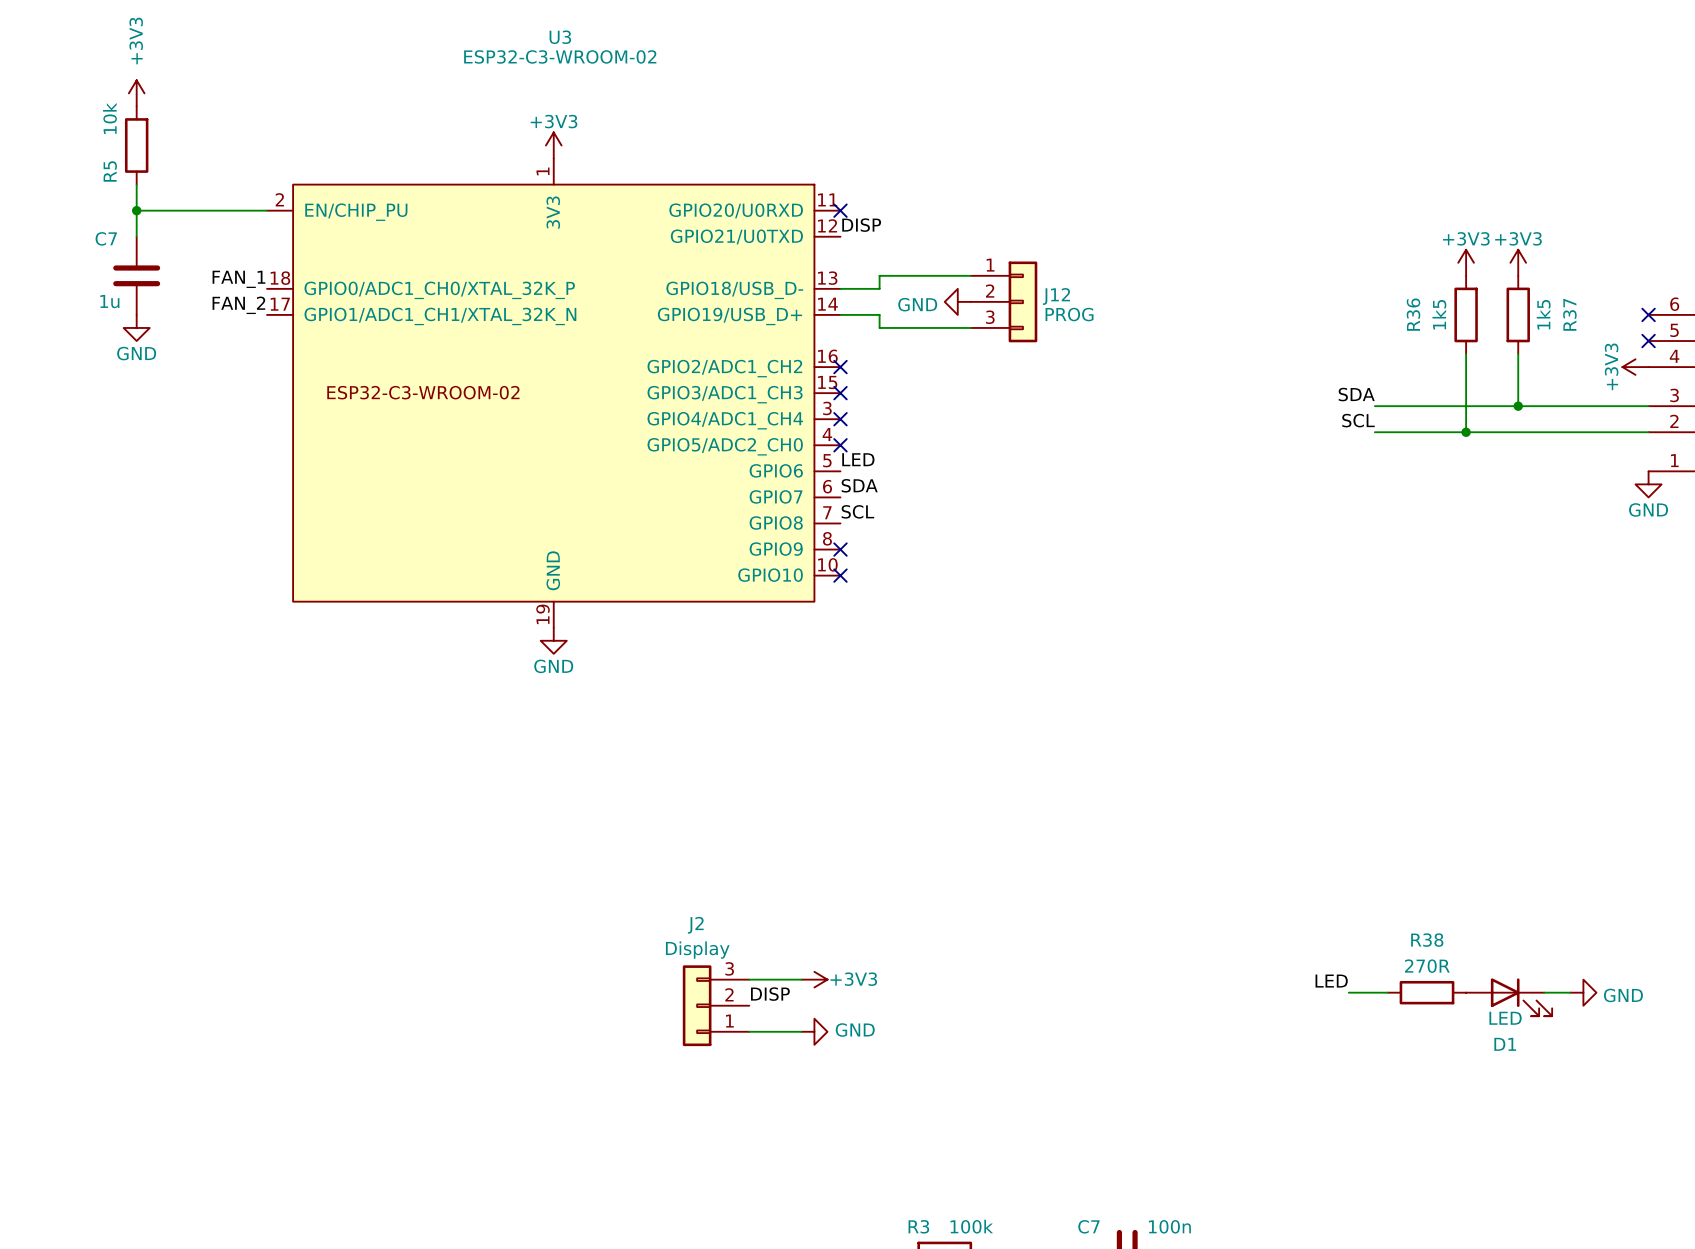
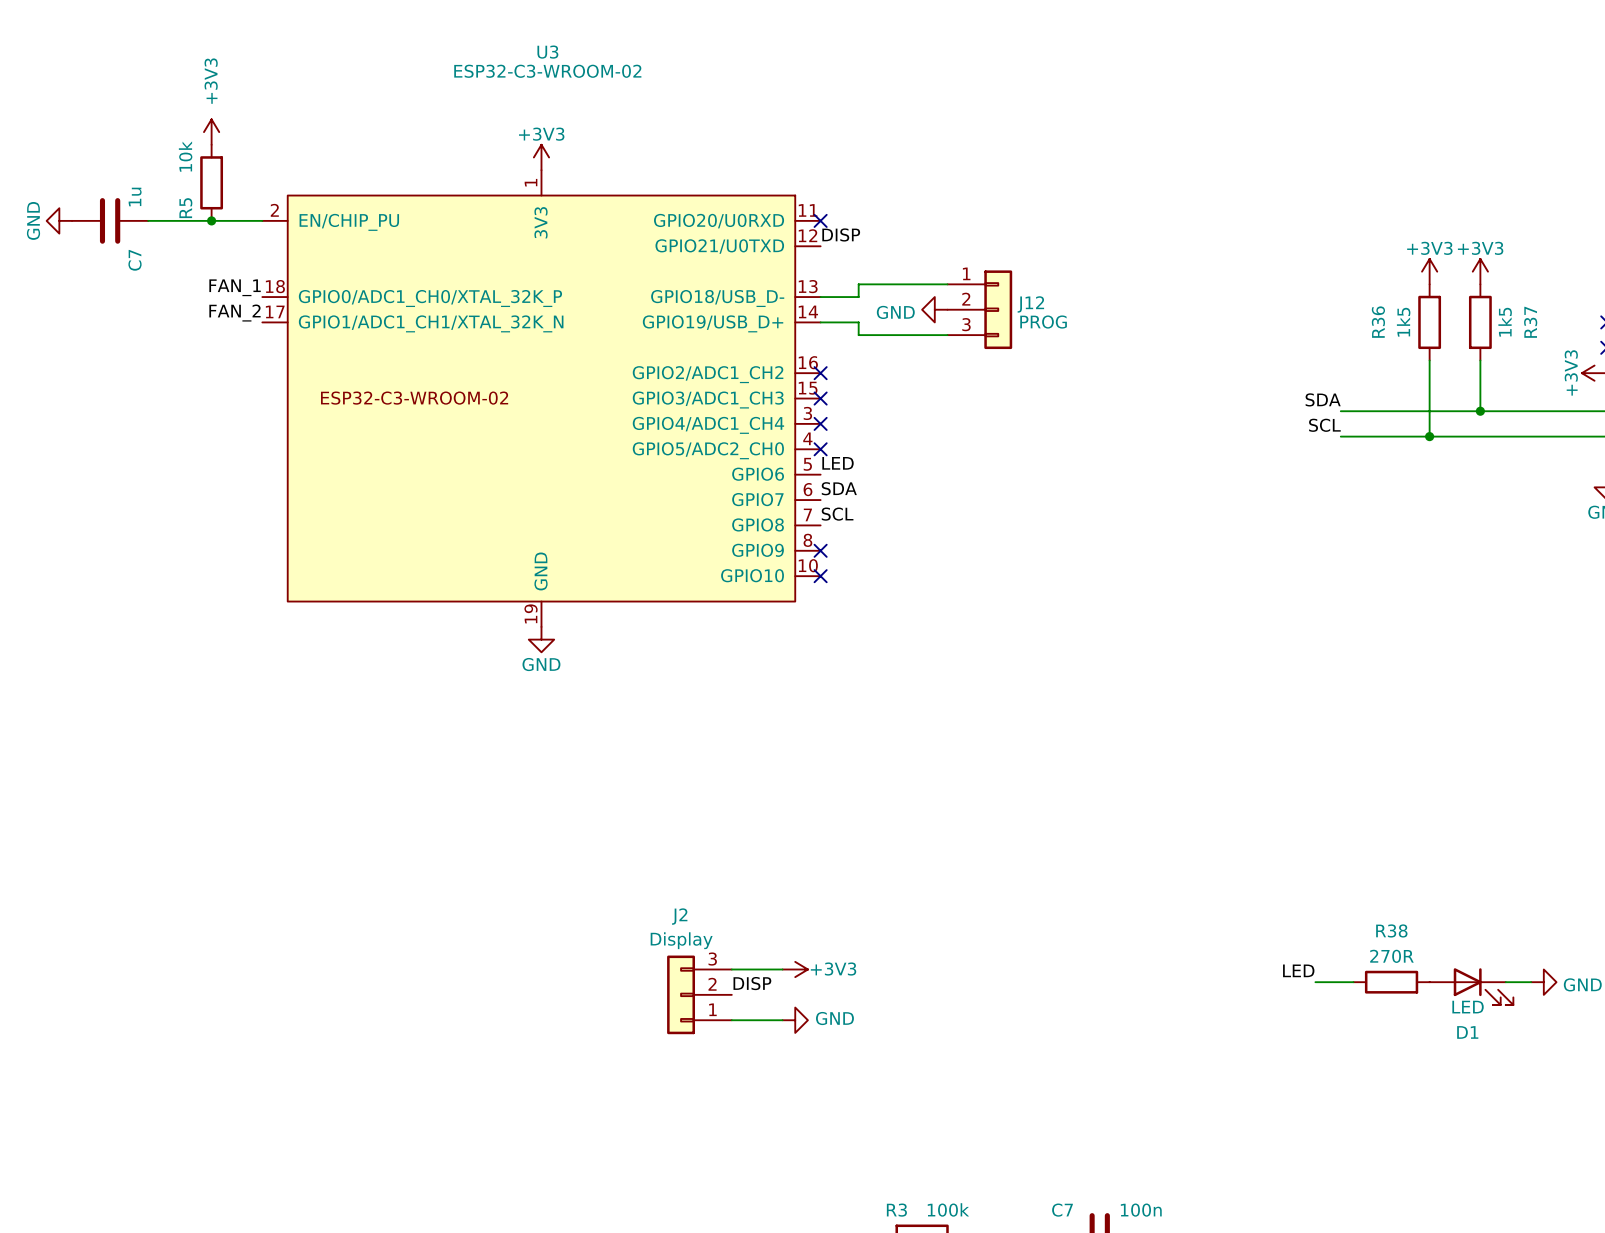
power symbol position: +3V3 (136, 93) -> +3V3 (211, 132)
R5 position: (136, 145) -> (211, 182)
wire: (136, 184) (136, 236) -> none
junction: (136, 210) -> none
junction: none -> (211, 220)
C7 name position: C7 (106, 238) -> C7 (135, 260)
C7 rotation: 0° (136, 275) -> 90° clockwise (110, 220)
C7 position: (136, 275) -> (110, 220)
C7 value position: 1u (109, 301) -> 1u (135, 197)
power symbol rotation: 0° (136, 327) -> 90° clockwise (59, 220)
power symbol position: GND (136, 327) -> GND (59, 220)

